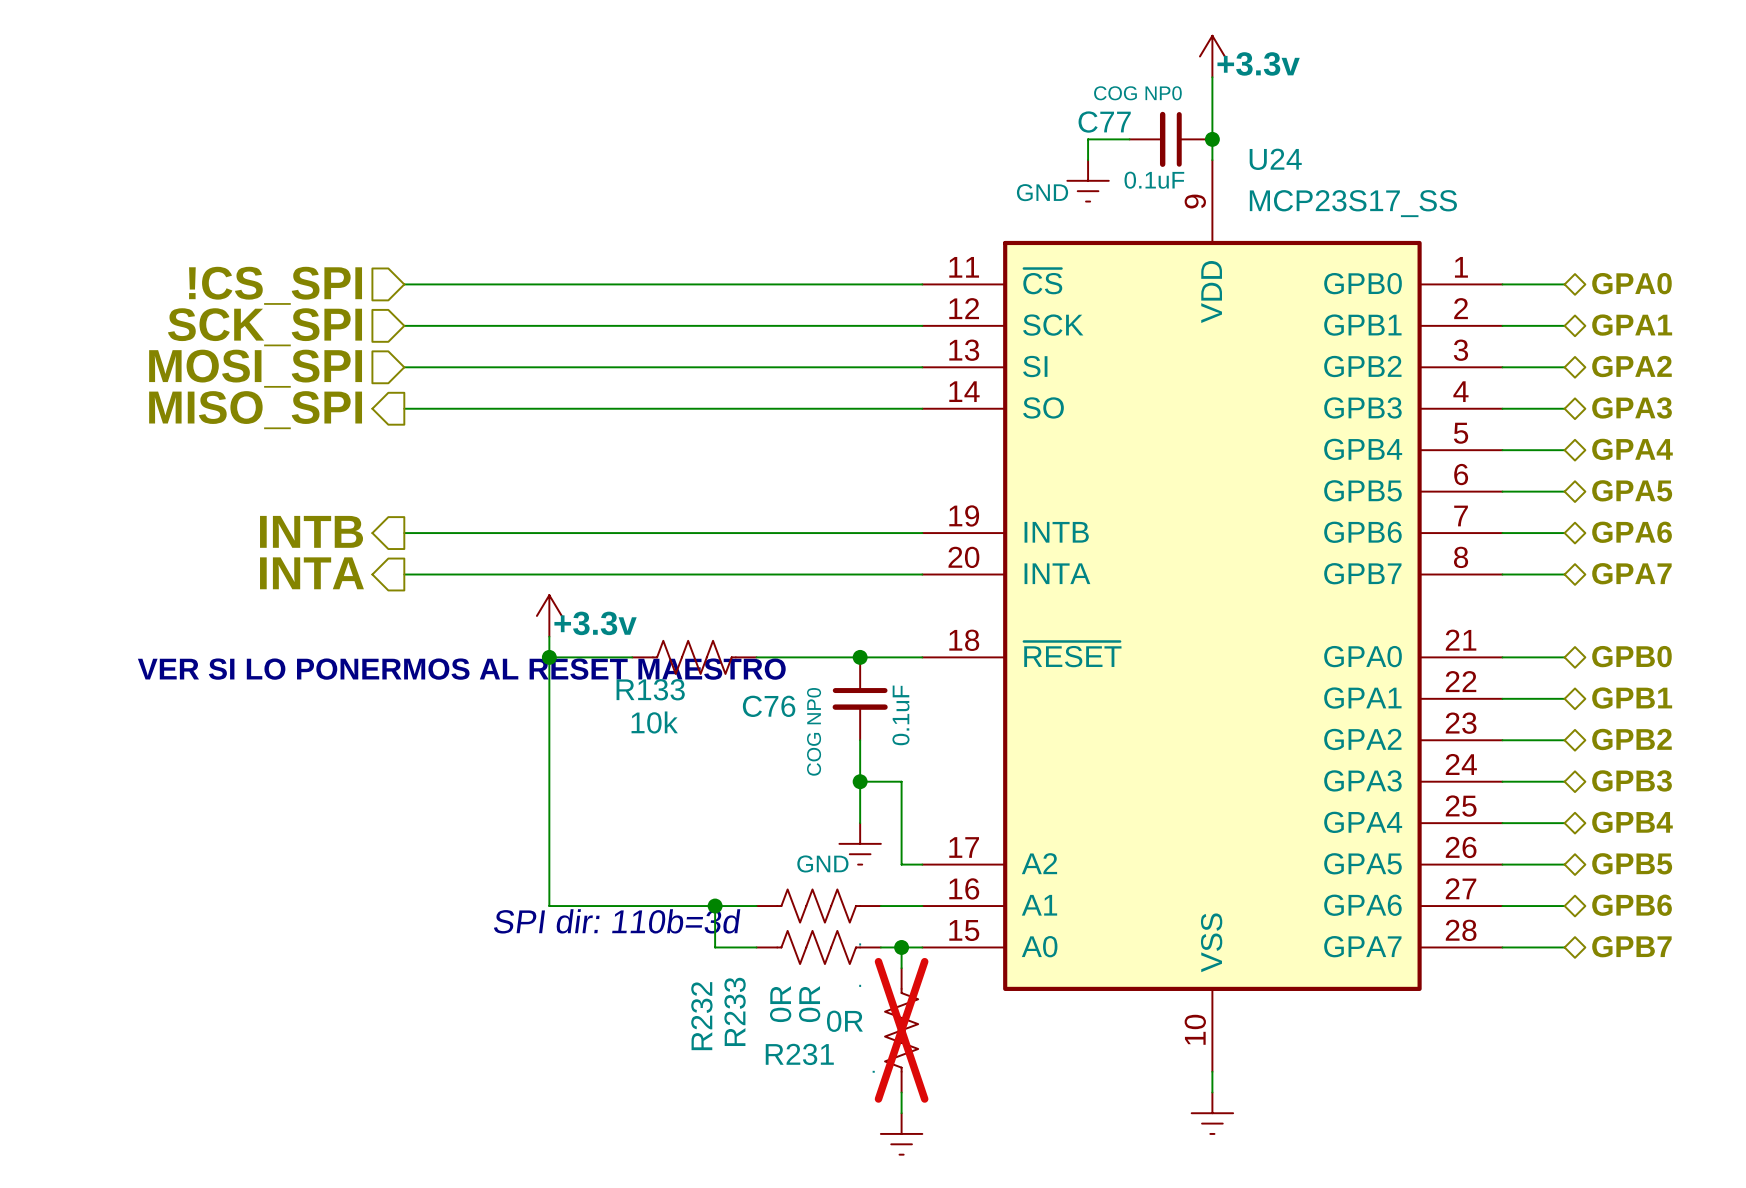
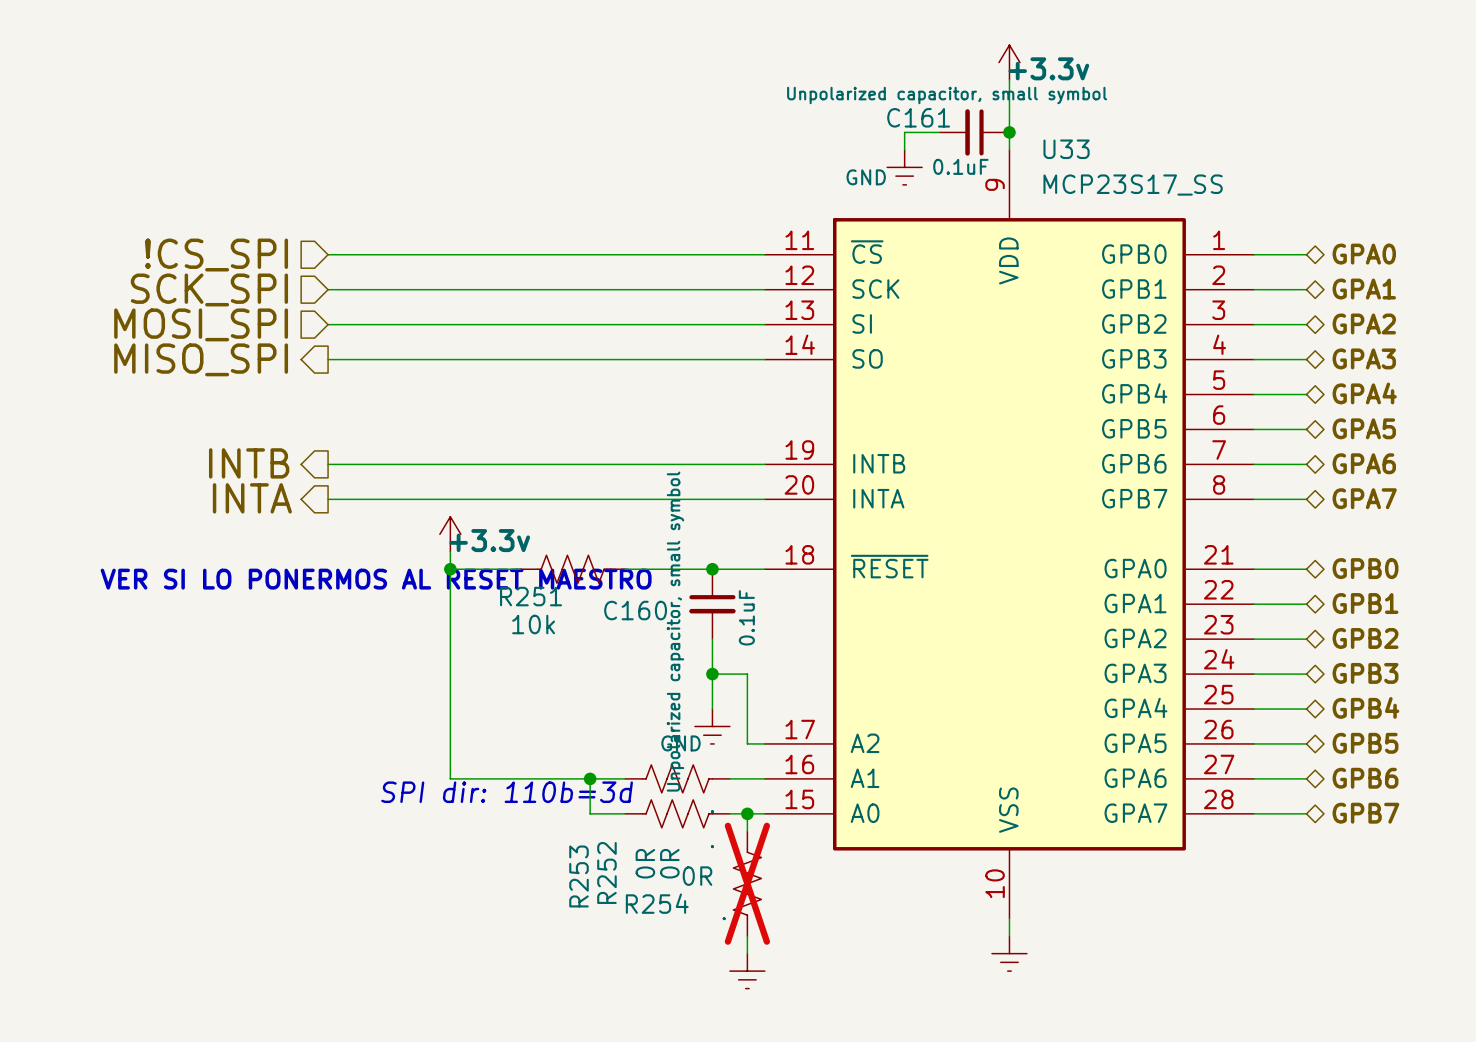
C77 text: COG NP0 (1137, 93) -> Unpolarized capacitor, small symbol (947, 95)
C77 name: C77 (1104, 122) -> C161 (918, 117)
U24 name: U24 (1275, 159) -> U33 (1066, 149)
R133 name: R133 (650, 689) -> R251 (531, 596)
C76 name: C76 (769, 706) -> C160 (635, 610)
C76 text: COG NP0 (814, 731) -> Unpolarized capacitor, small symbol (675, 631)
R233 name: R233 (735, 1011) -> R252 (606, 872)
R232 name: R232 (701, 1016) -> R253 (579, 876)
R231 name: R231 (799, 1054) -> R254 (657, 903)

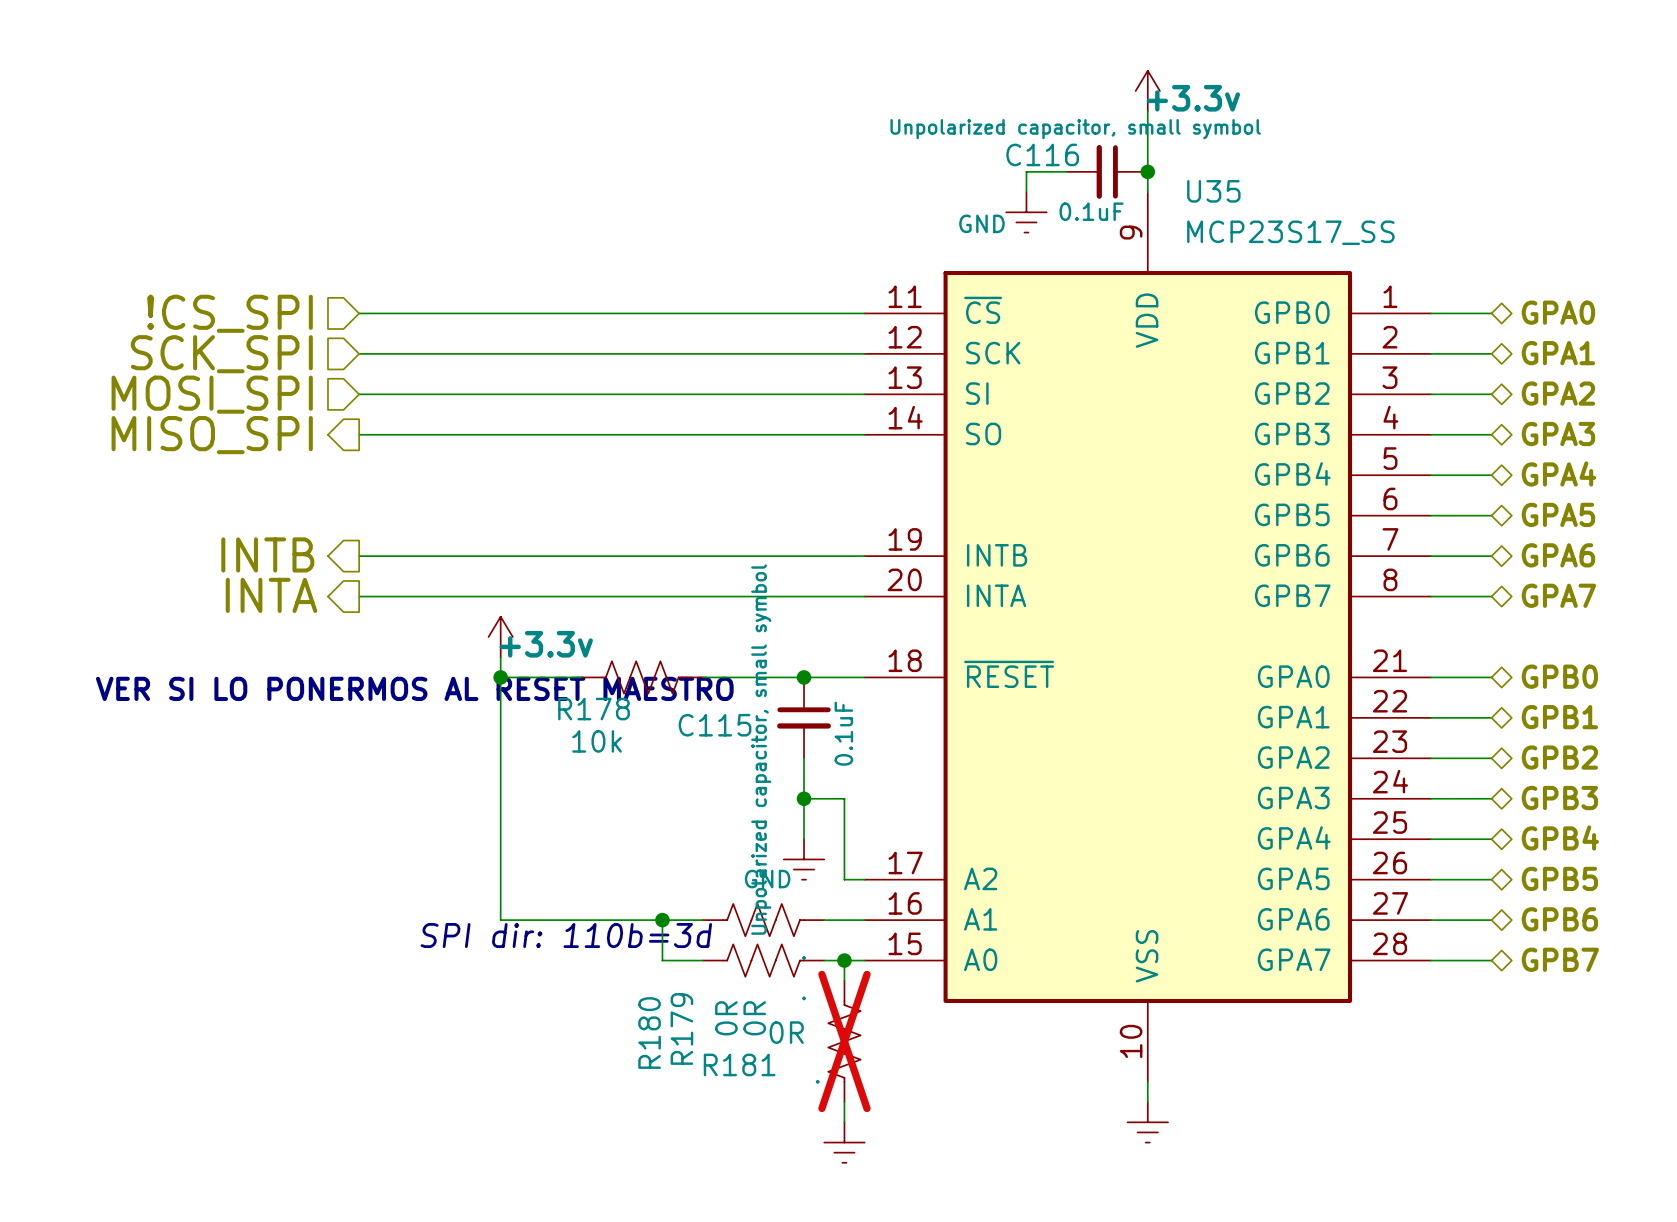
C161 name: C161 (918, 117) -> C116 (1042, 154)
U33 name: U33 (1066, 149) -> U35 (1213, 191)
R251 name: R251 (531, 596) -> R178 (594, 709)
C160 name: C160 (635, 610) -> C115 (715, 725)
R252 name: R252 (606, 872) -> R179 (681, 1028)
R253 name: R253 (579, 876) -> R180 (649, 1033)
R254 name: R254 (657, 903) -> R181 (739, 1064)

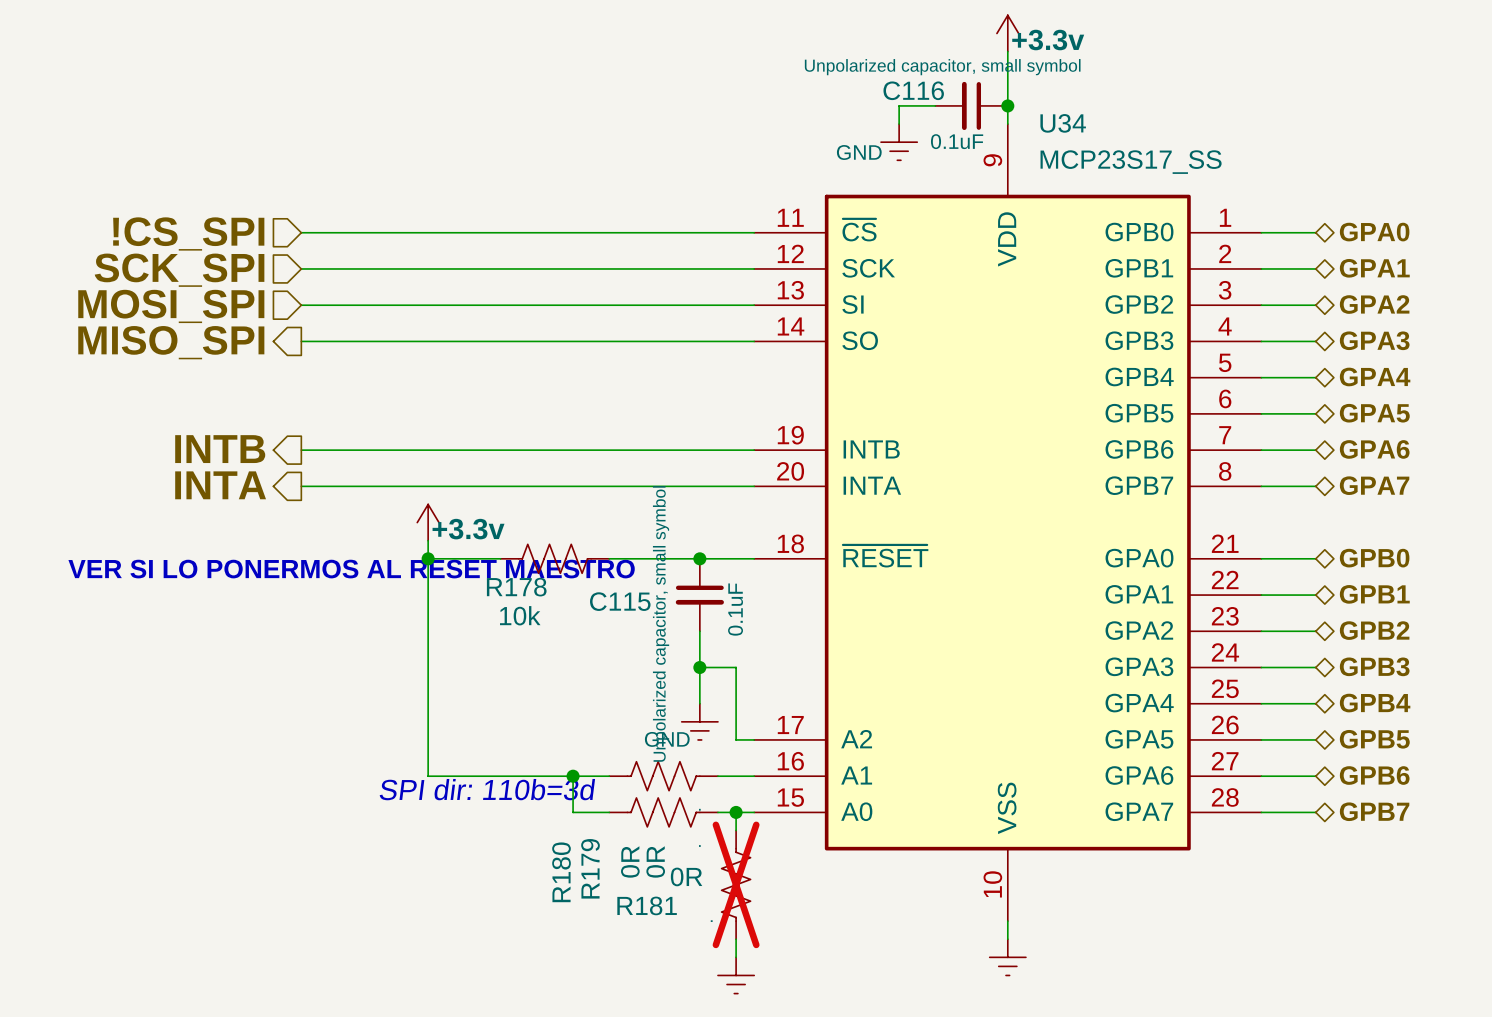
U35 name: U35 (1213, 191) -> U34 (1063, 123)

